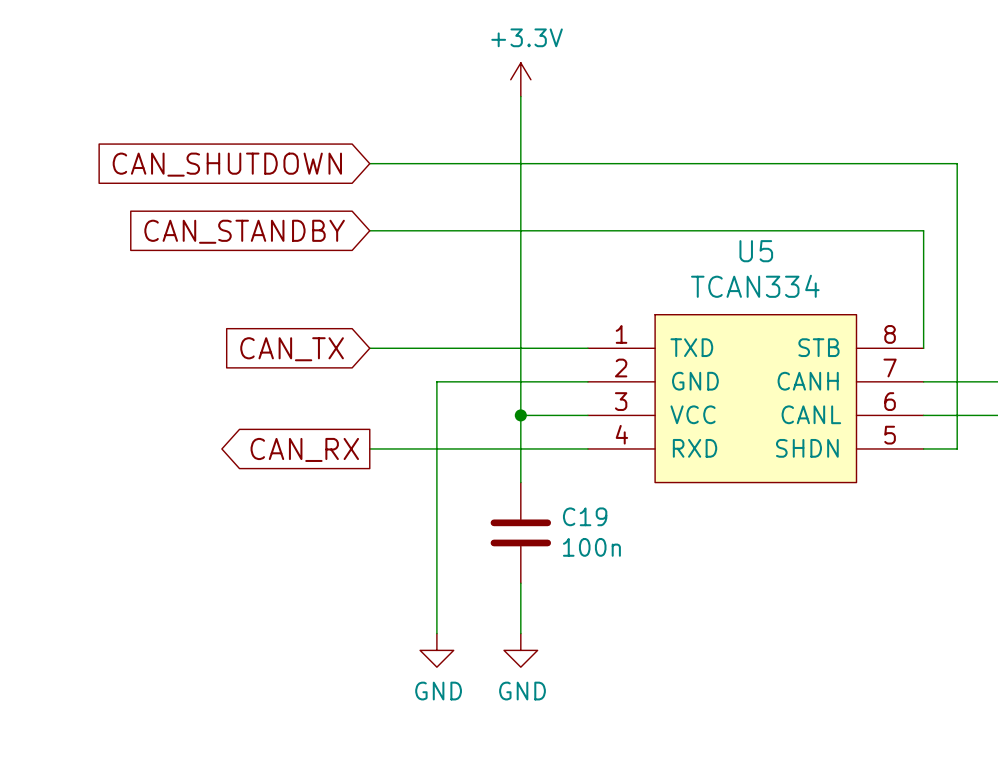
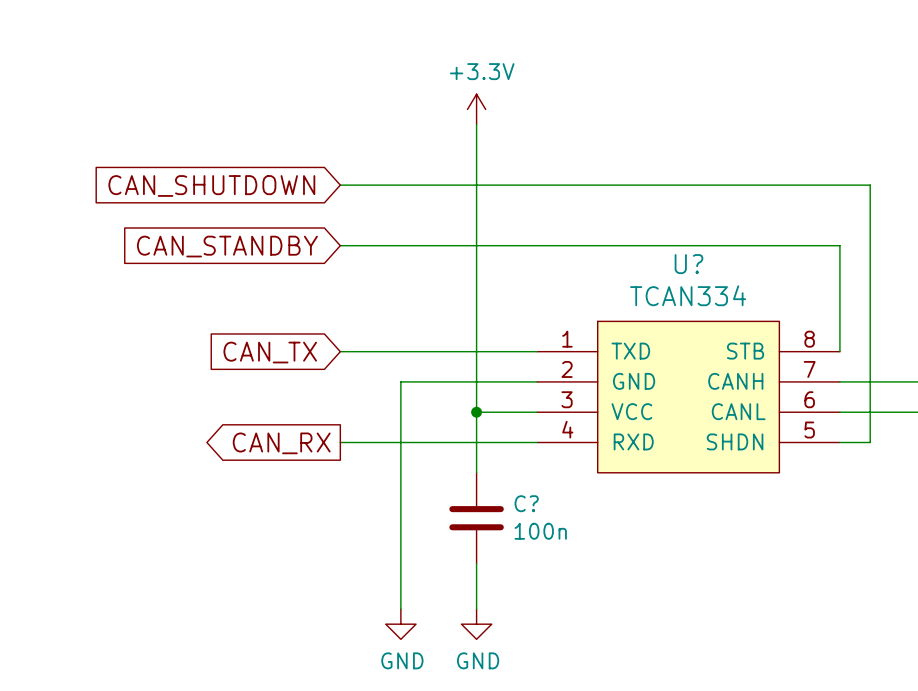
U5 name: U5 (756, 251) -> U? (688, 264)
C19 name: C19 (585, 516) -> C? (526, 503)

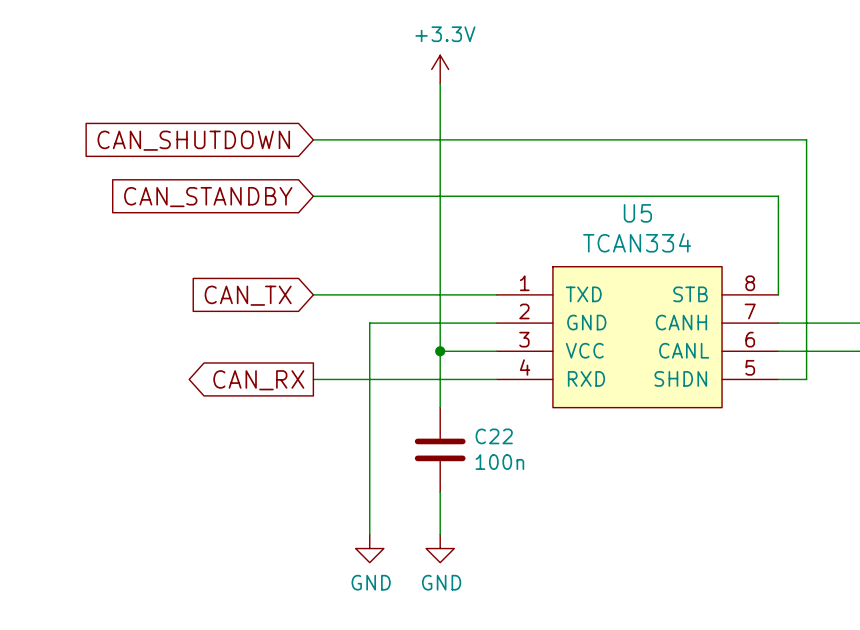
U? name: U? (688, 264) -> U5 (637, 213)
C? name: C? (526, 503) -> C22 (494, 436)

